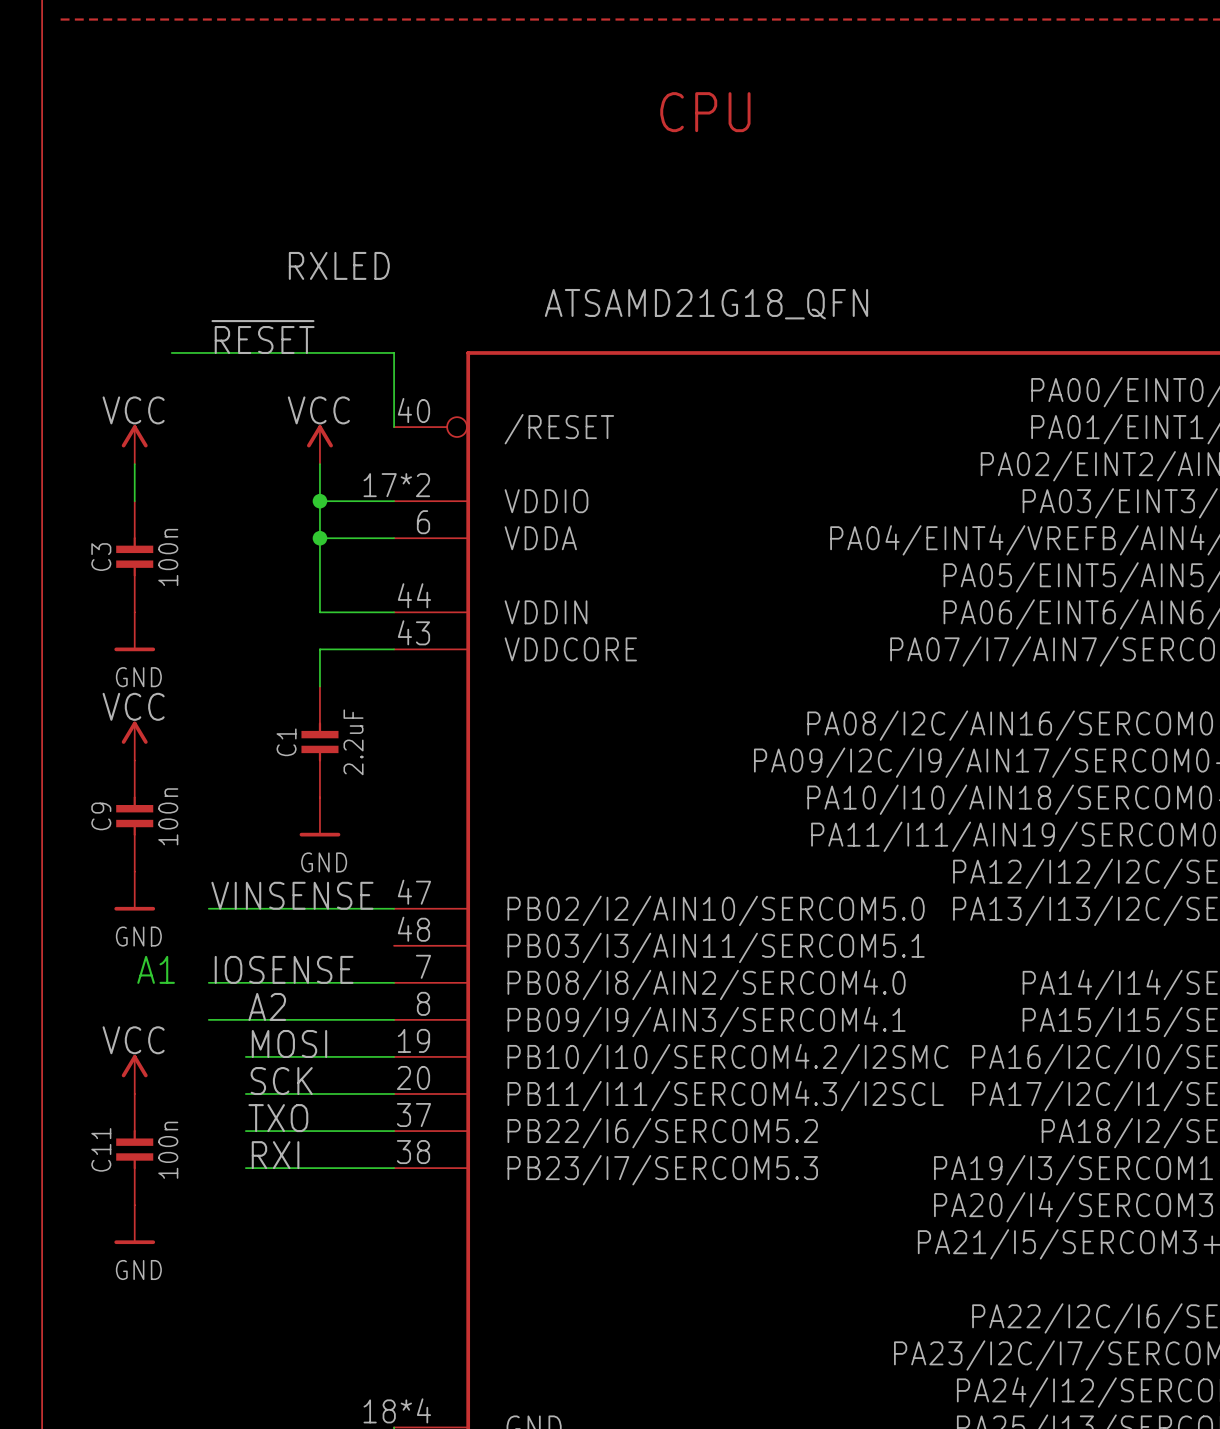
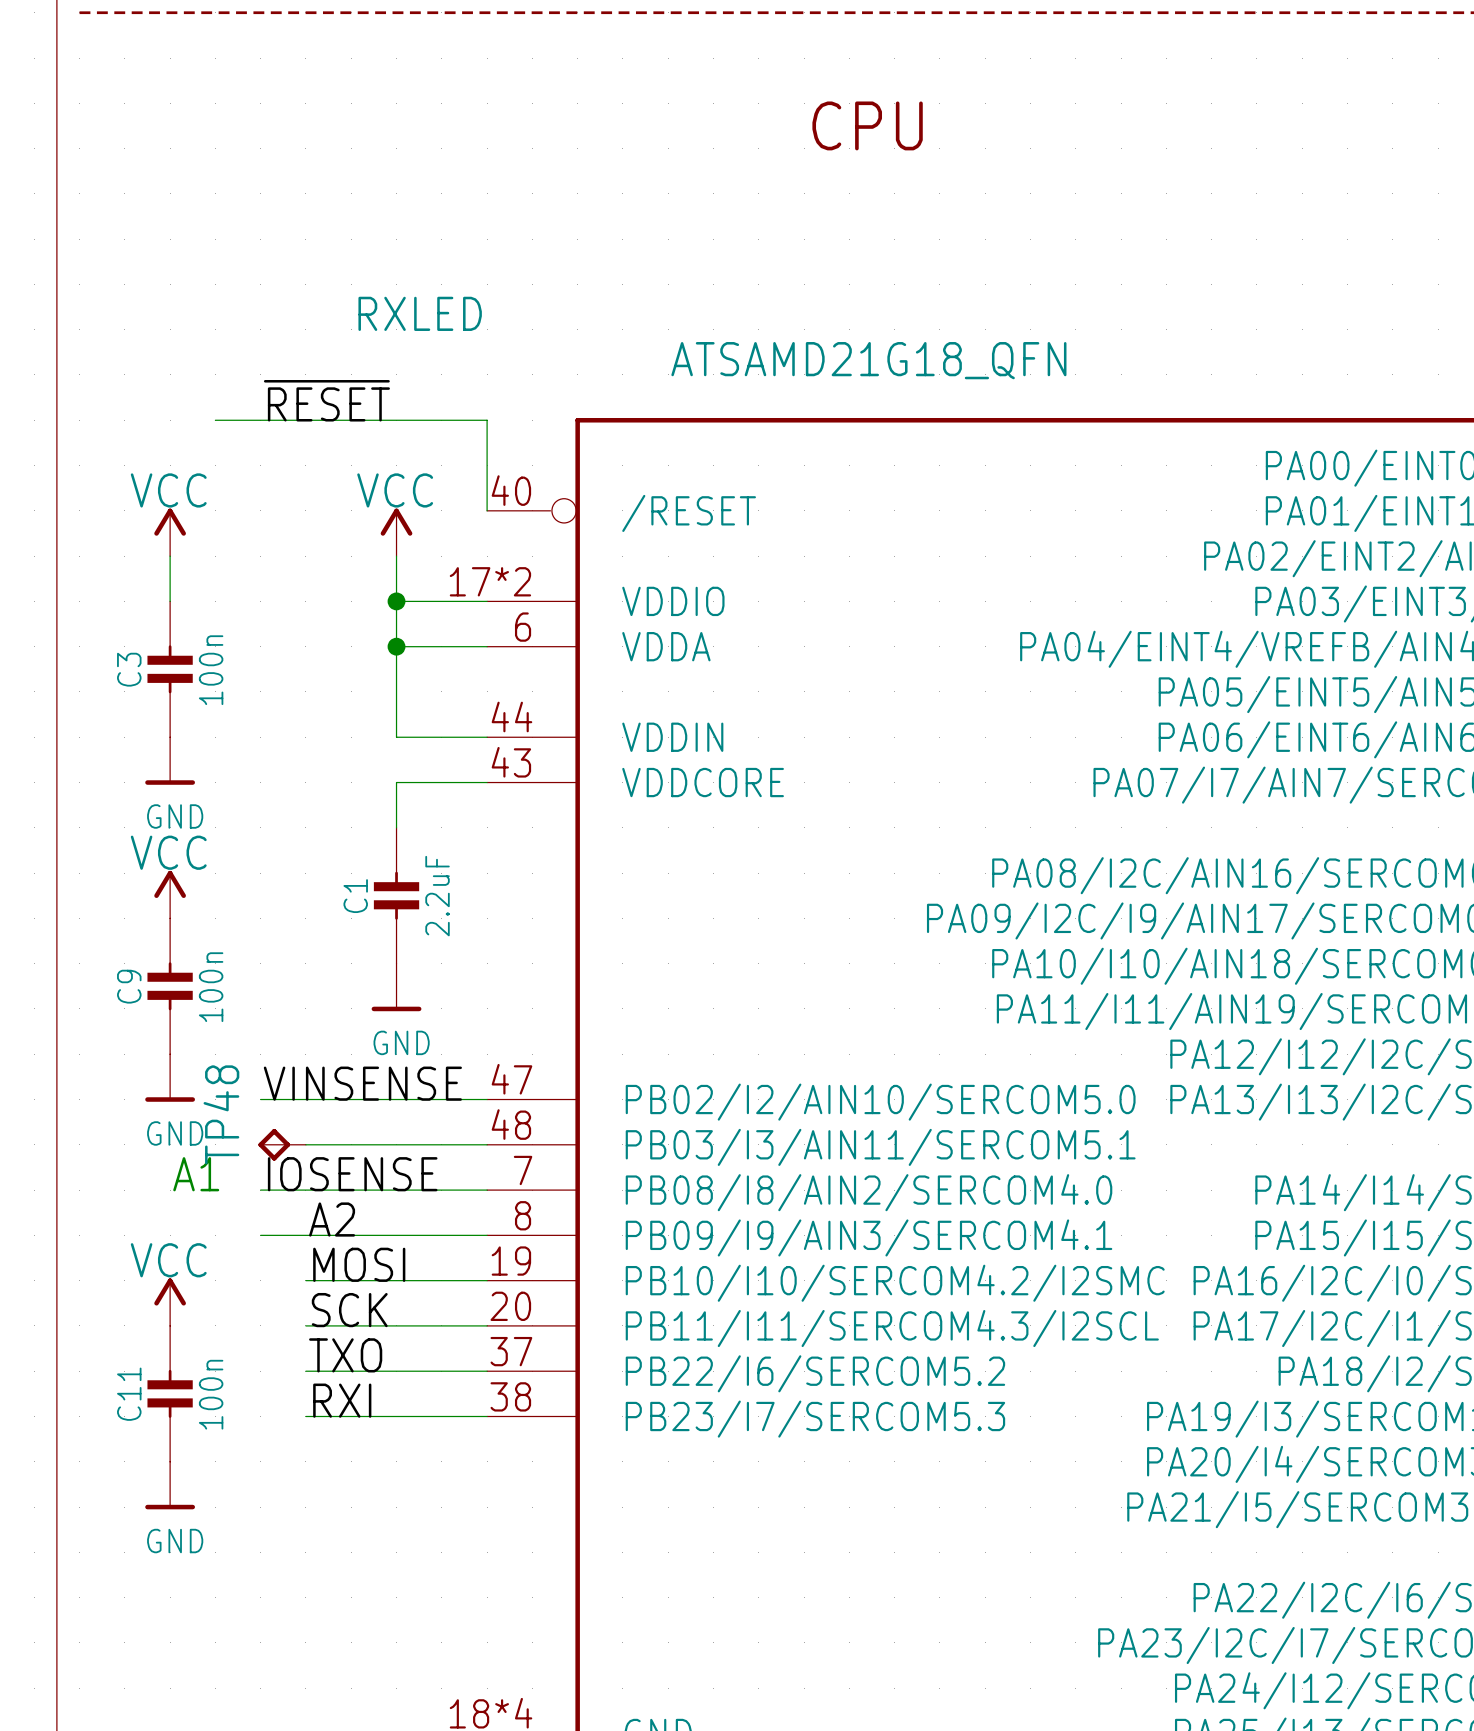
TP48: none -> (282, 1144)
wire: none -> (305, 1144) (487, 1144)

